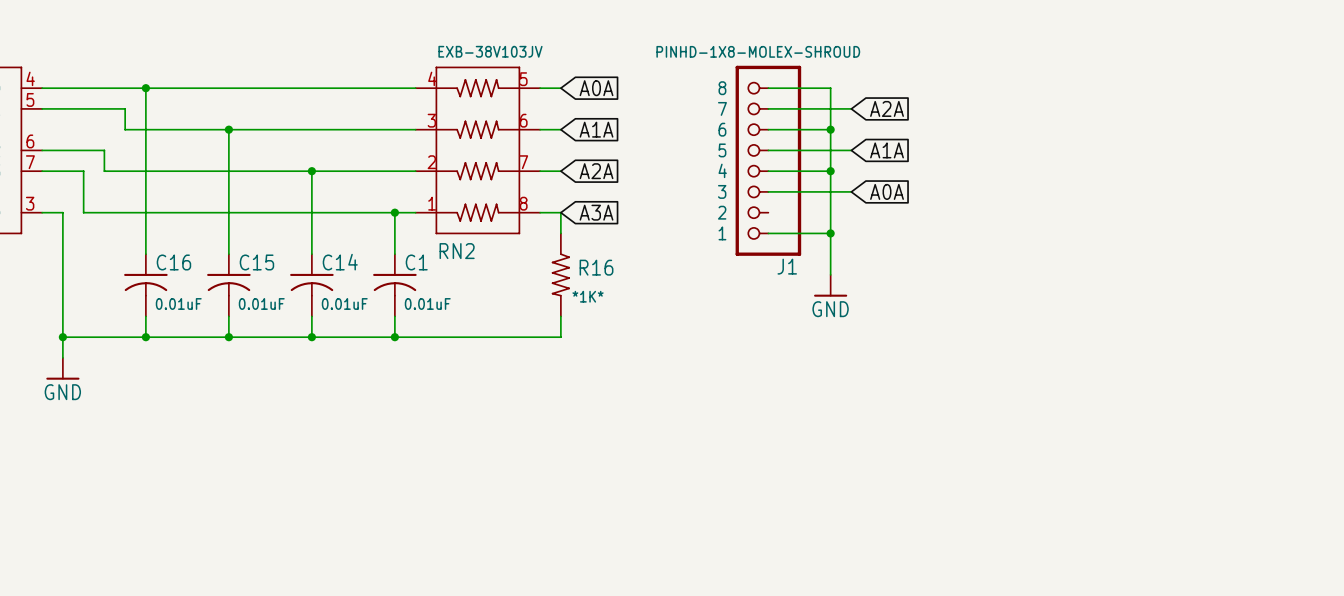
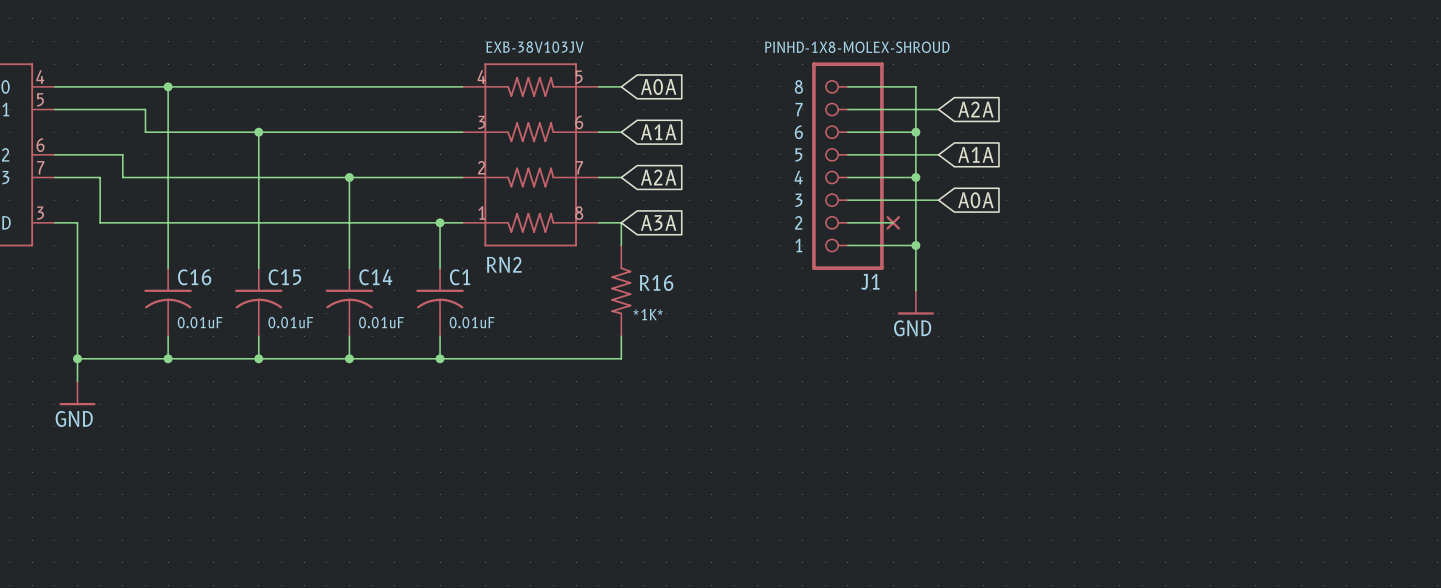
wire: none -> (847, 222) (893, 222)
part: none -> (893, 222)

